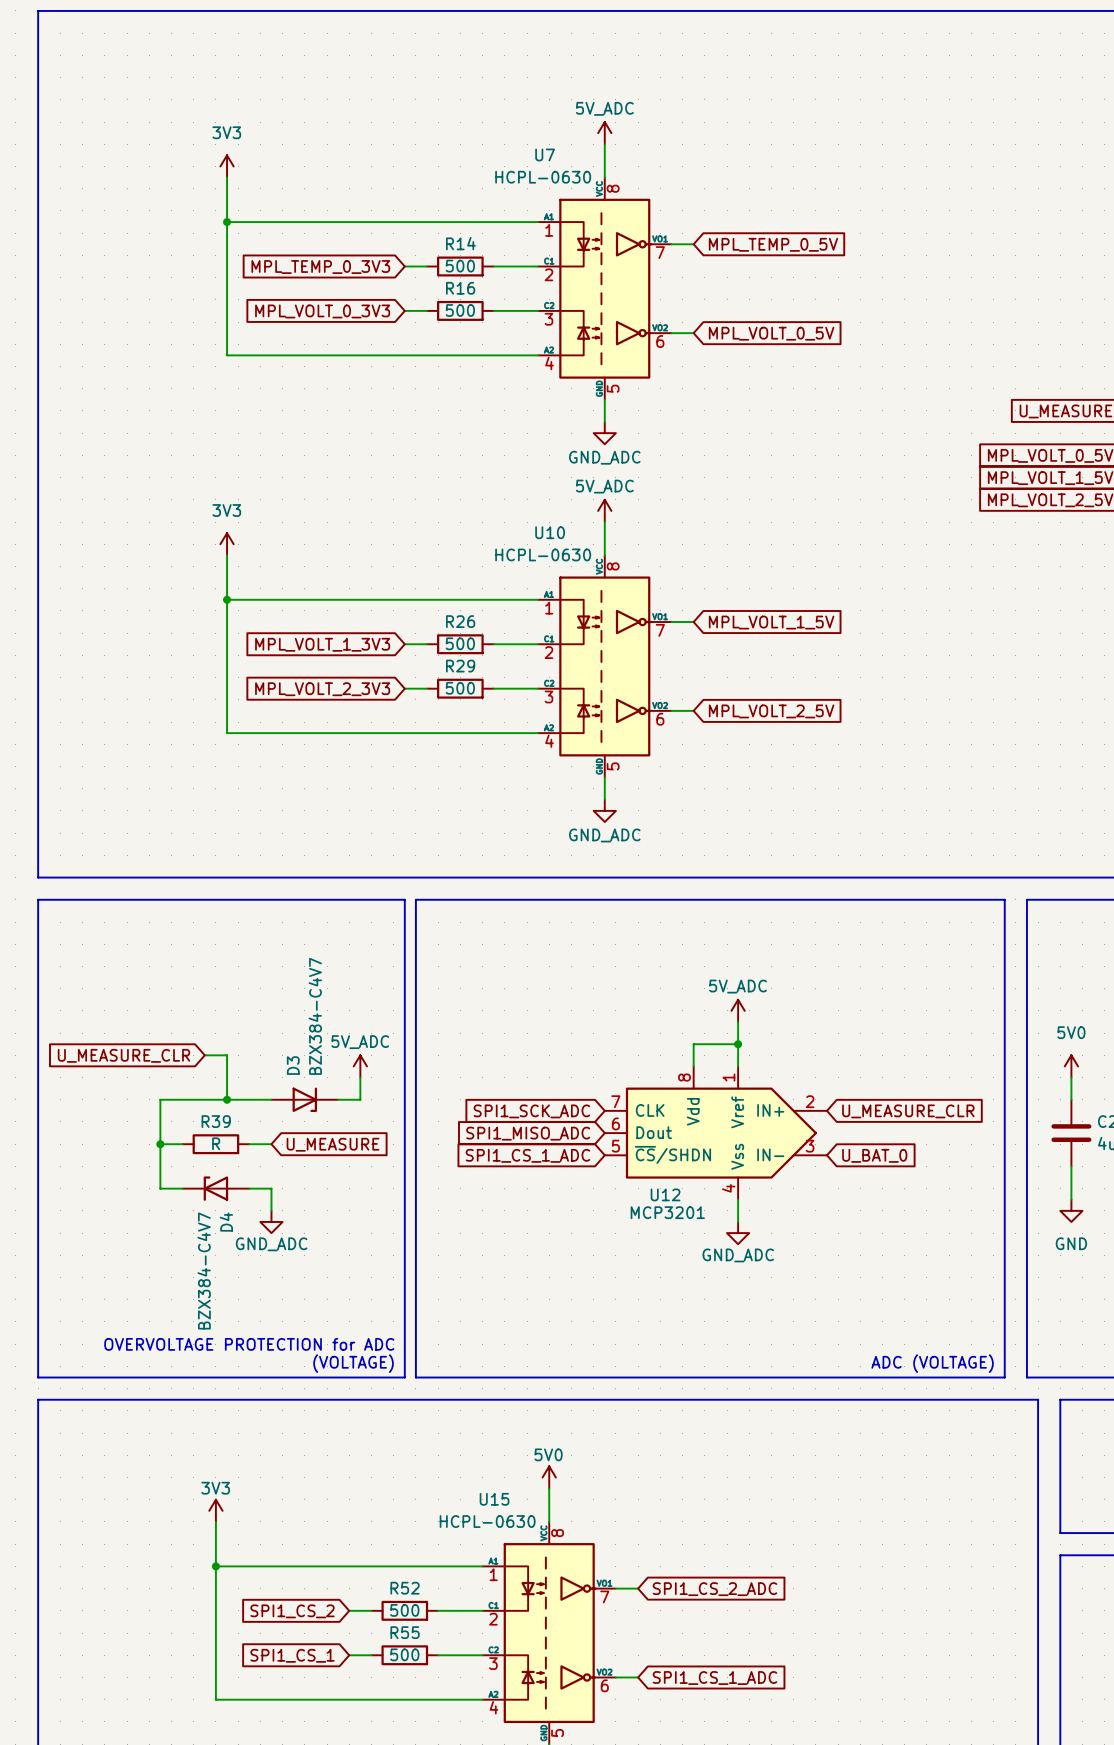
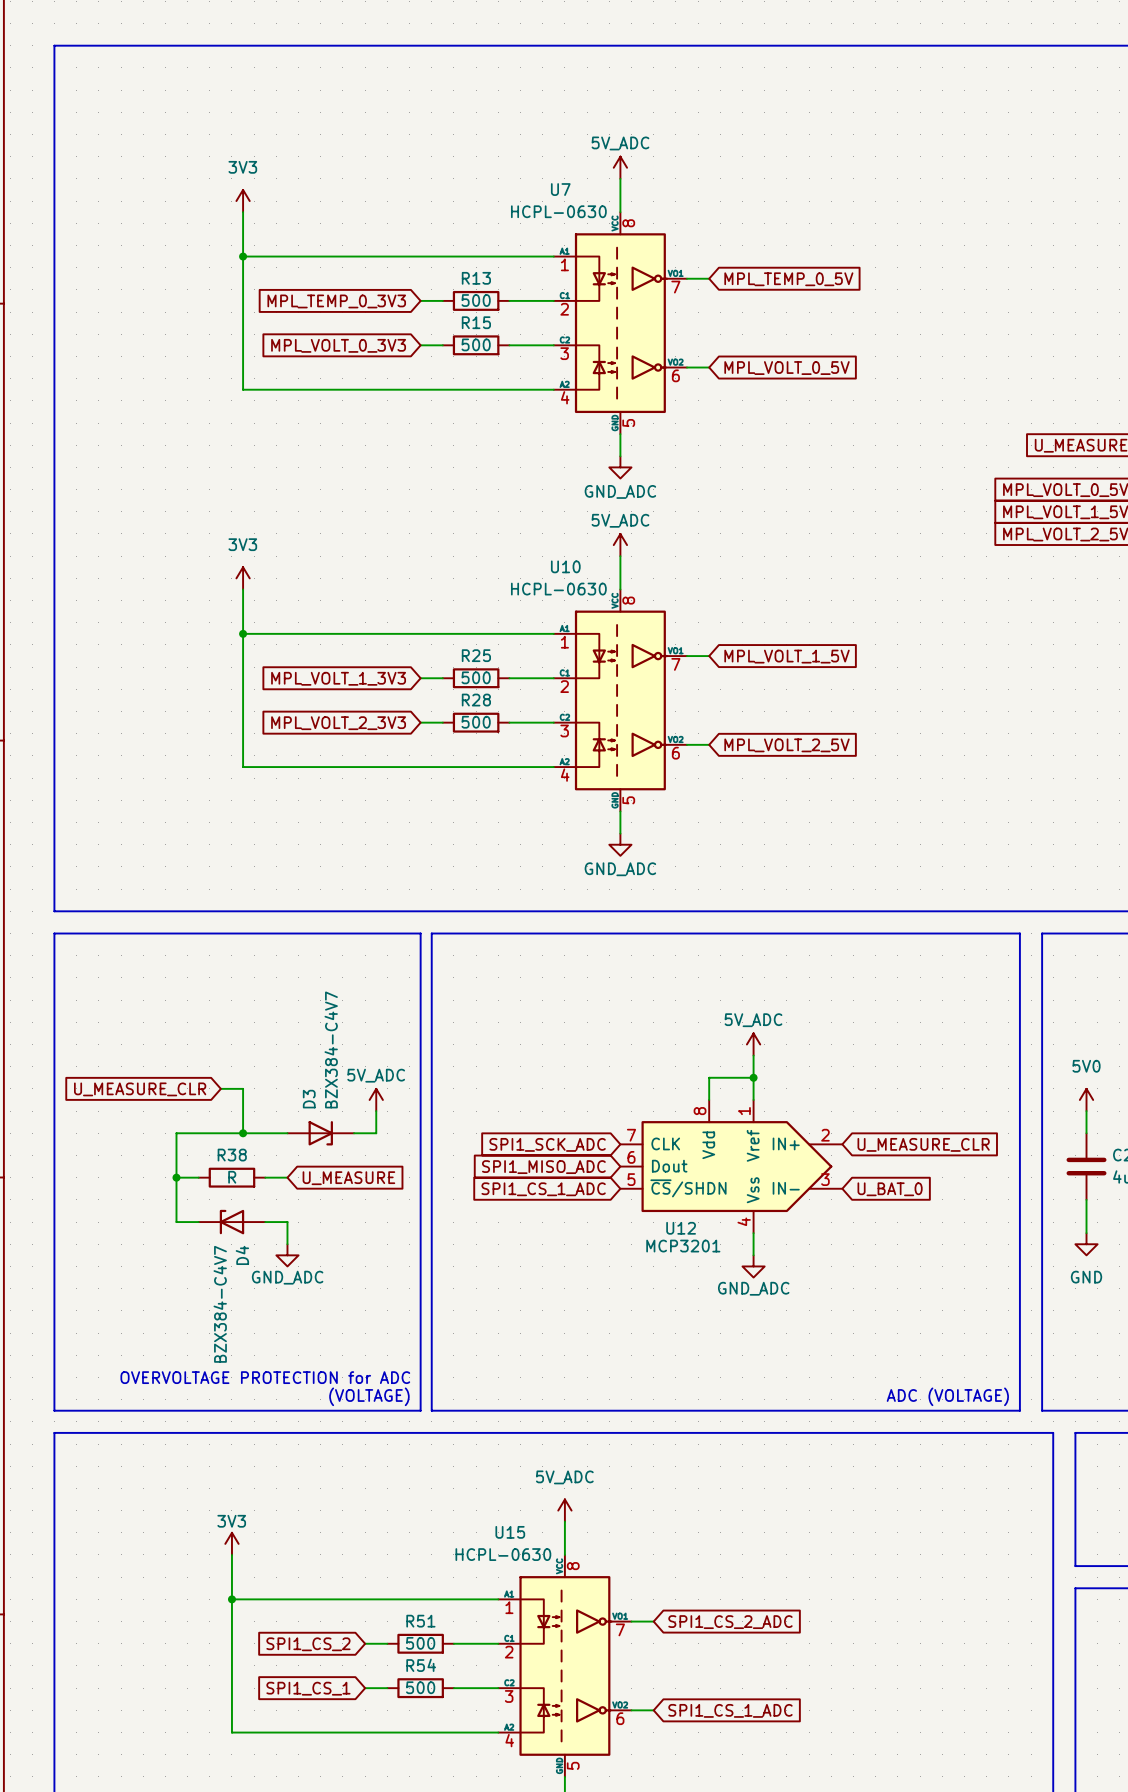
R14 name: R14 (460, 243) -> R13 (476, 278)
R16 name: R16 (460, 288) -> R15 (476, 322)
R26 name: R26 (460, 621) -> R25 (476, 655)
R29 name: R29 (460, 666) -> R28 (476, 700)
R39 name: R39 (216, 1121) -> R38 (232, 1155)
power symbol: 5V0 (549, 1477) -> 5V_ADC (564, 1510)
R52 name: R52 (405, 1588) -> R51 (420, 1621)
R55 name: R55 (405, 1632) -> R54 (421, 1665)

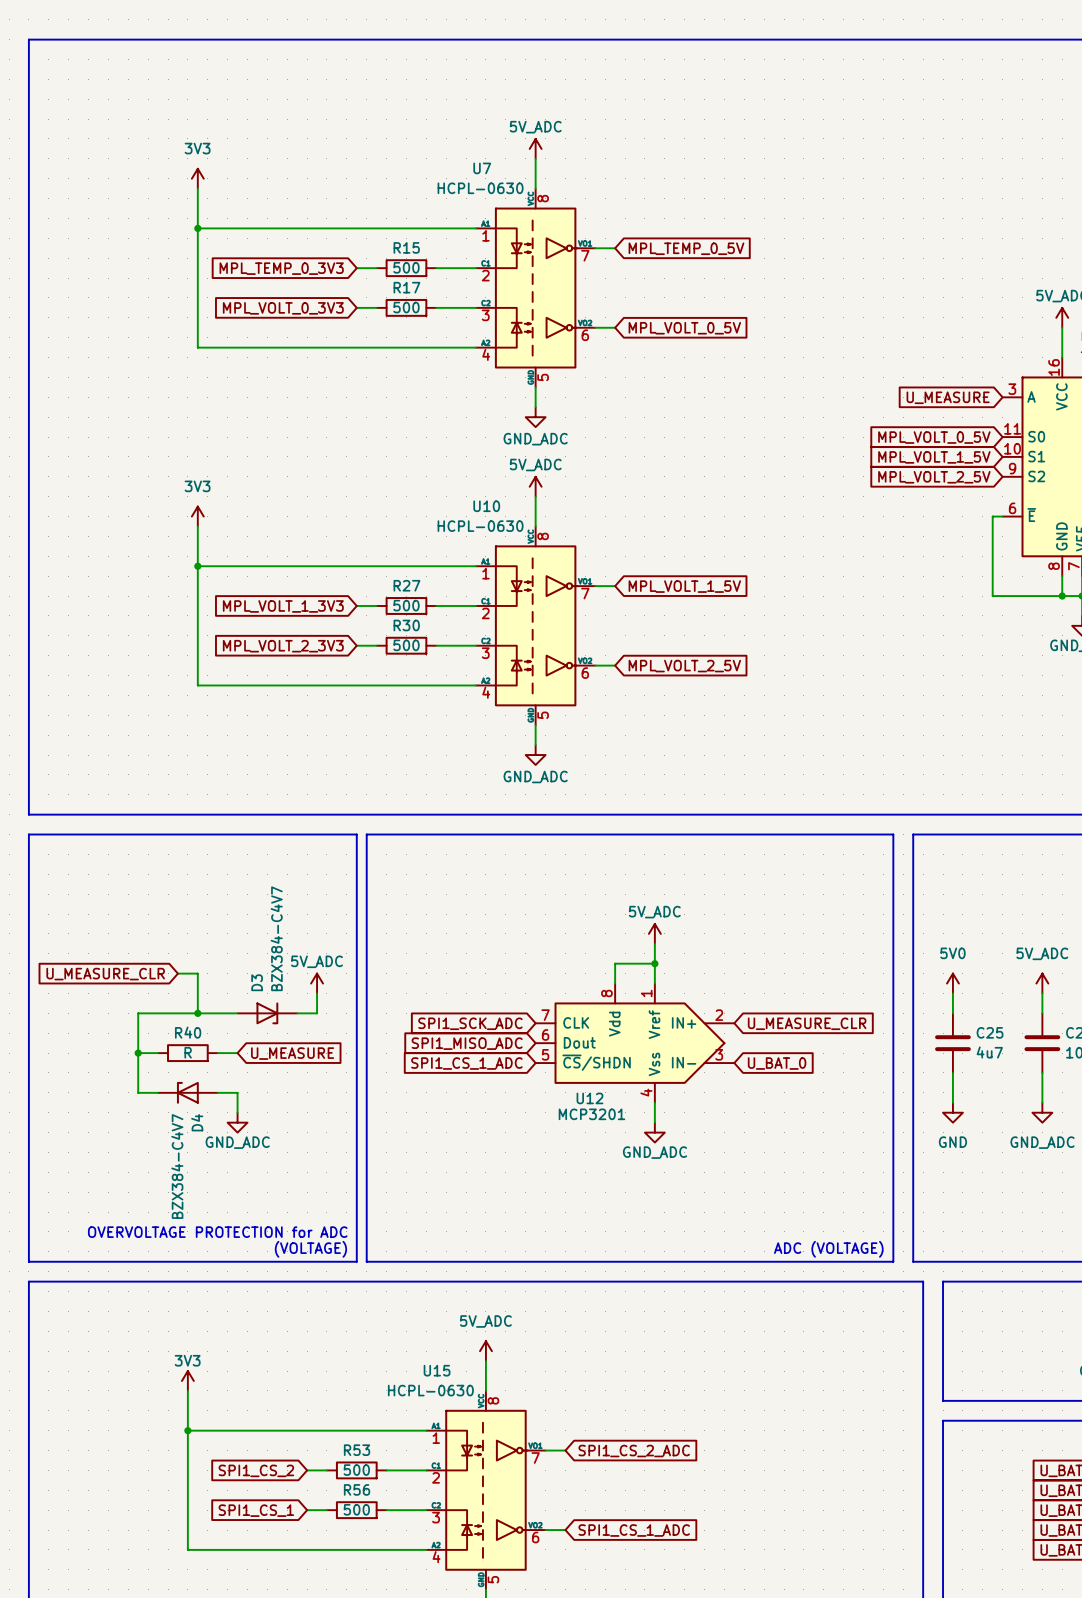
R13 name: R13 (476, 278) -> R15 (406, 247)
R15 name: R15 (476, 322) -> R17 (406, 287)
R25 name: R25 (476, 655) -> R27 (406, 585)
R28 name: R28 (476, 700) -> R30 (406, 625)
R38 name: R38 (232, 1155) -> R40 (188, 1032)
R51 name: R51 (420, 1621) -> R53 (357, 1450)
R54 name: R54 (421, 1665) -> R56 (357, 1489)

